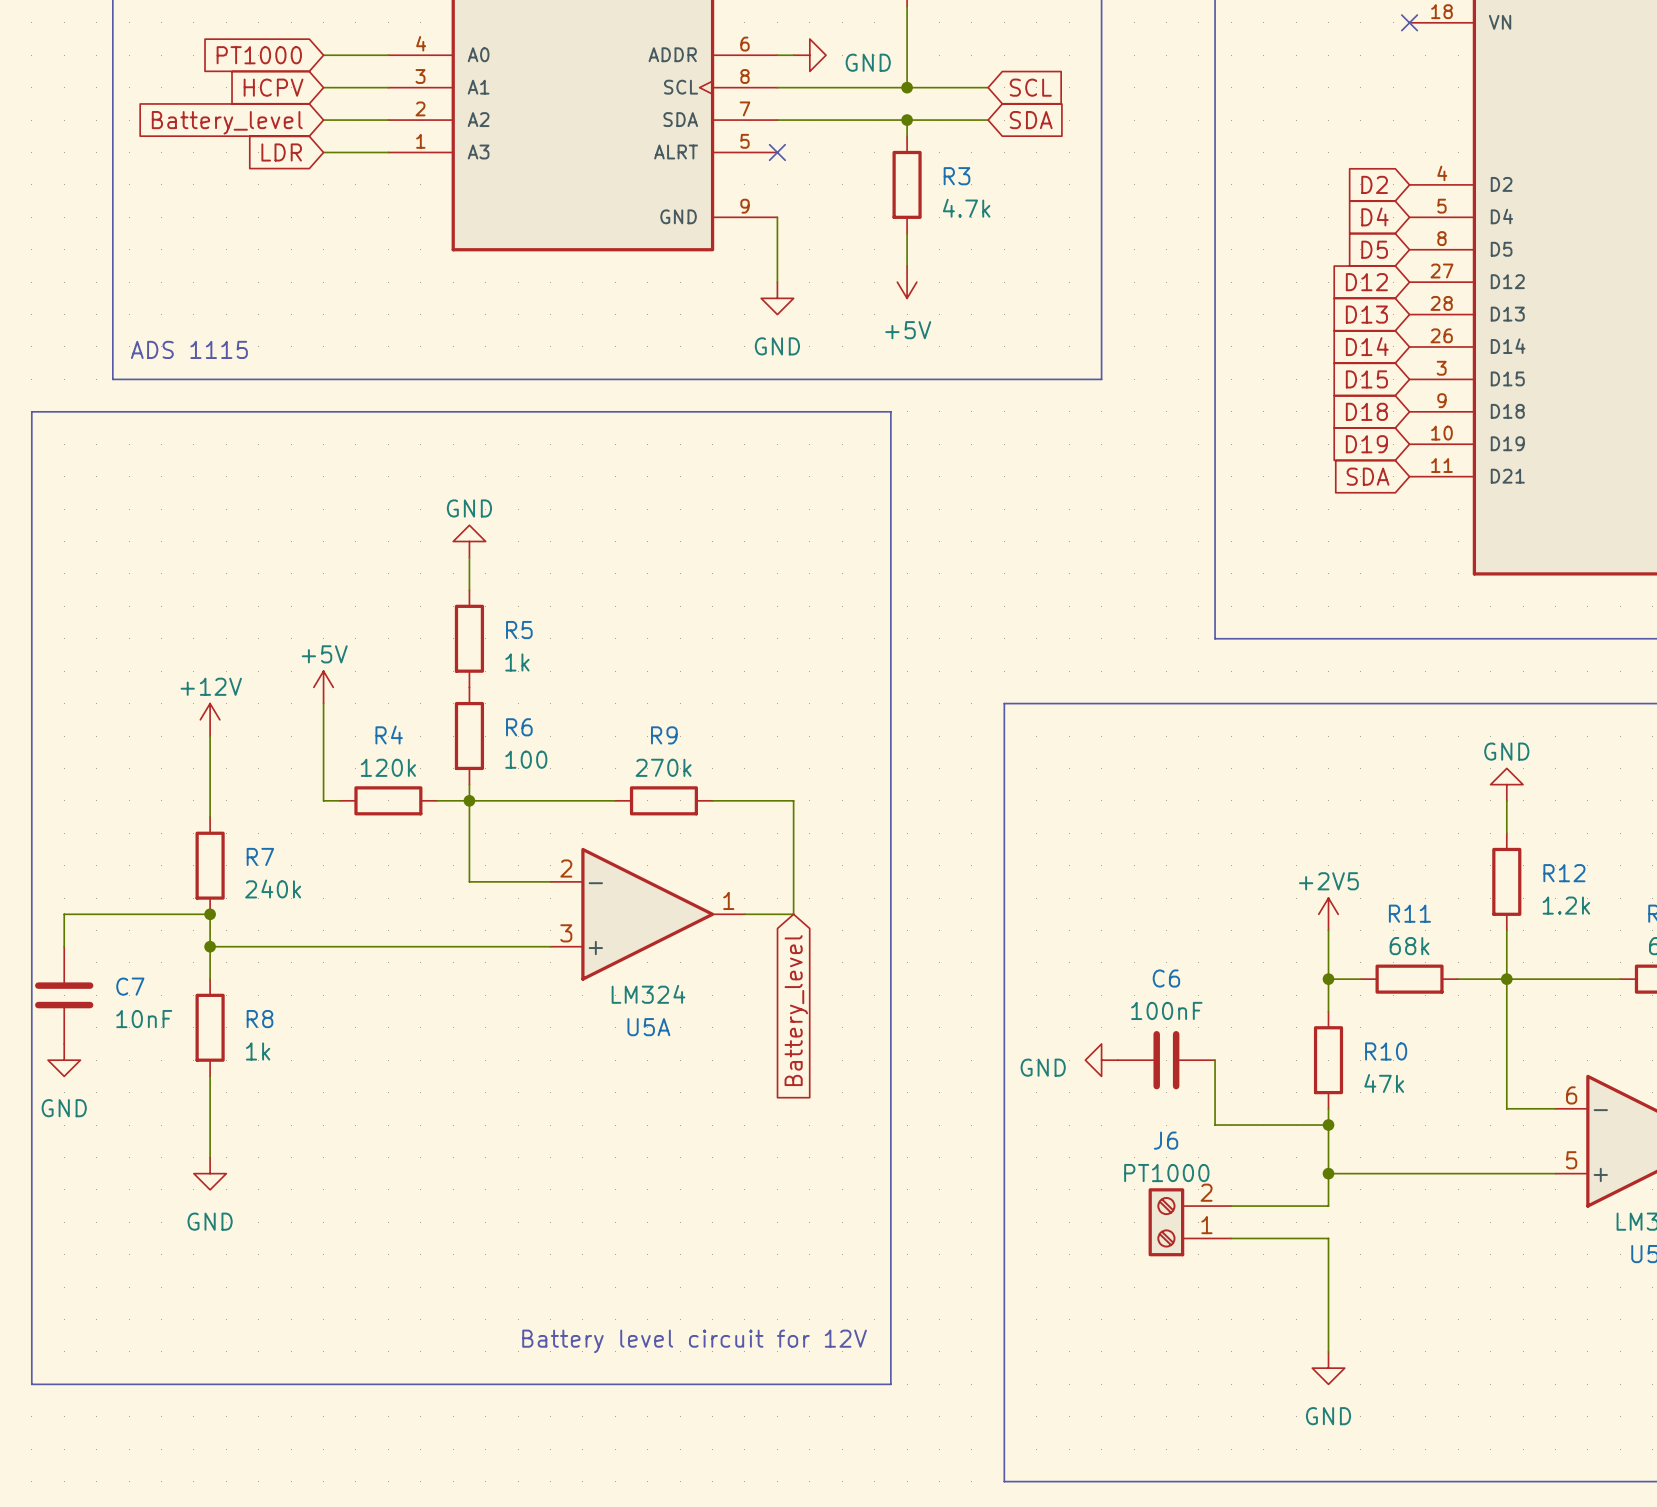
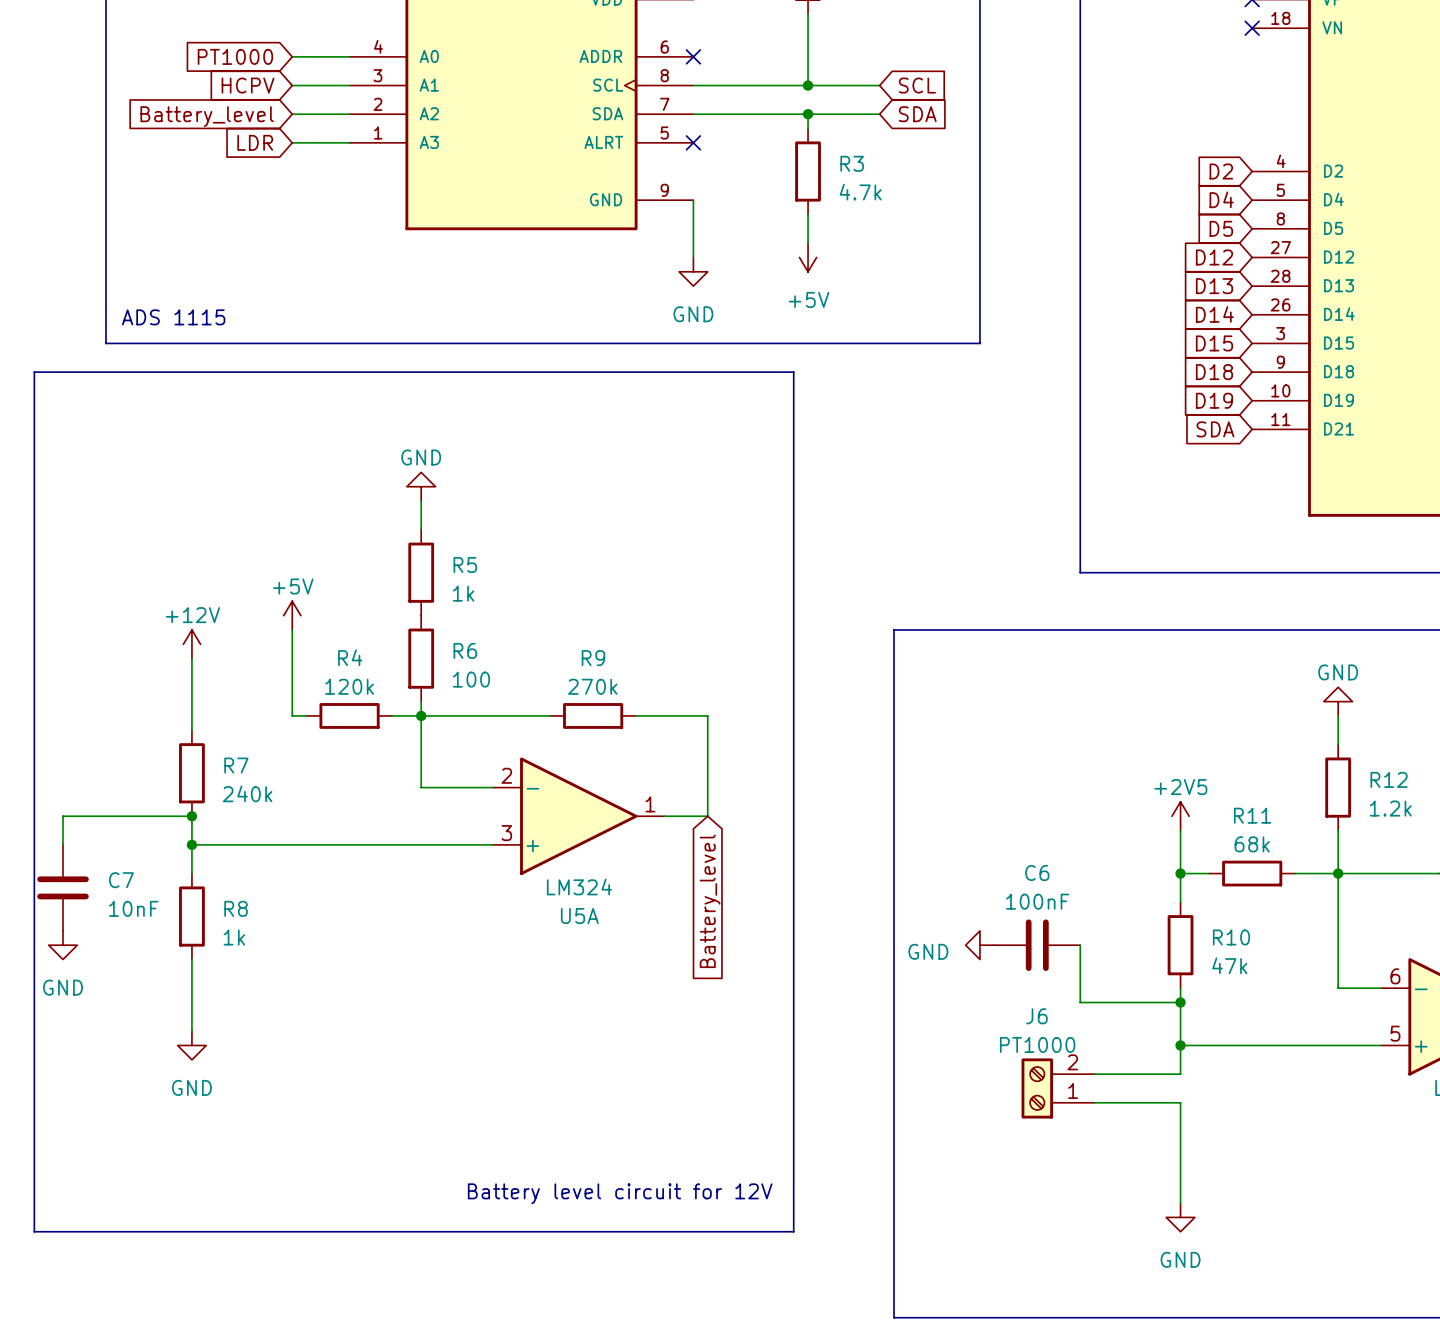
wire: (777, 55) (793, 55) -> none
no-connect mark: none -> (693, 56)
power symbol: GND (809, 55) -> none

